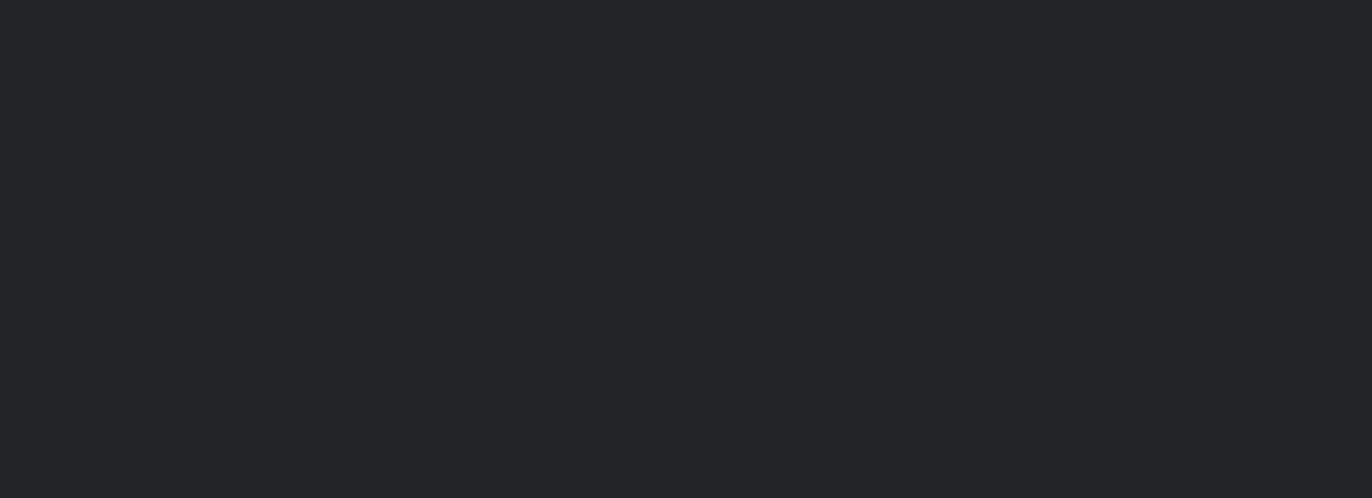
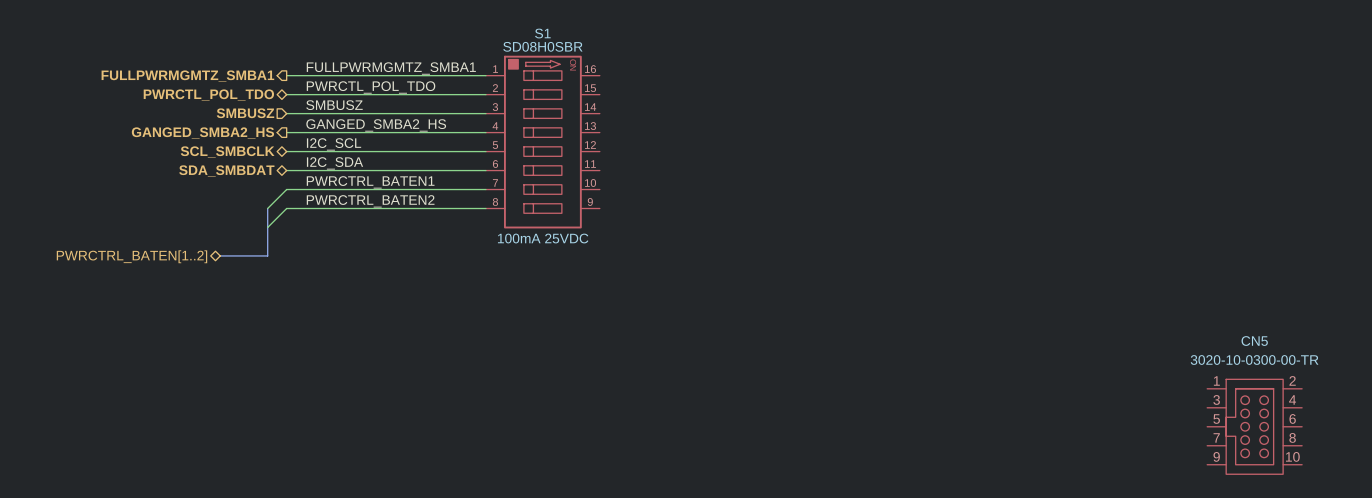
label: none -> FULLPWRMGMTZ_SMBA1 (391, 68)
wire: none -> (286, 75) (485, 75)
hierarchical label: none -> FULLPWRMGMTZ_SMBA1 (187, 76)
label: none -> PWRCTL_POL_TDO (371, 87)
wire: none -> (286, 94) (485, 94)
hierarchical label: none -> PWRCTL_POL_TDO (208, 95)
label: none -> SMBUSZ (334, 105)
hierarchical label: none -> SMBUSZ (245, 113)
wire: none -> (286, 113) (485, 113)
label: none -> GANGED_SMBA2_HS (376, 125)
wire: none -> (286, 132) (485, 132)
hierarchical label: none -> GANGED_SMBA2_HS (202, 133)
S1: none -> 100mA 25VDC (542, 142)
label: none -> I2C_SCL (334, 144)
hierarchical label: none -> SCL_SMBCLK (227, 151)
wire: none -> (286, 151) (485, 151)
label: none -> I2C_SDA (335, 163)
hierarchical label: none -> SDA_SMBDAT (226, 170)
wire: none -> (286, 170) (485, 170)
label: none -> PWRCTRL_BATEN1 (370, 182)
wire: none -> (485, 189) (286, 189) (267, 208)
label: none -> PWRCTRL_BATEN2 (370, 201)
bus: none -> (267, 208) (267, 255) (220, 255)
wire: none -> (485, 208) (286, 208) (267, 227)
hierarchical label: none -> PWRCTRL_BATEN[1..2] (131, 256)
CN5: none -> 3020-10-0300-00-TR (1254, 426)

